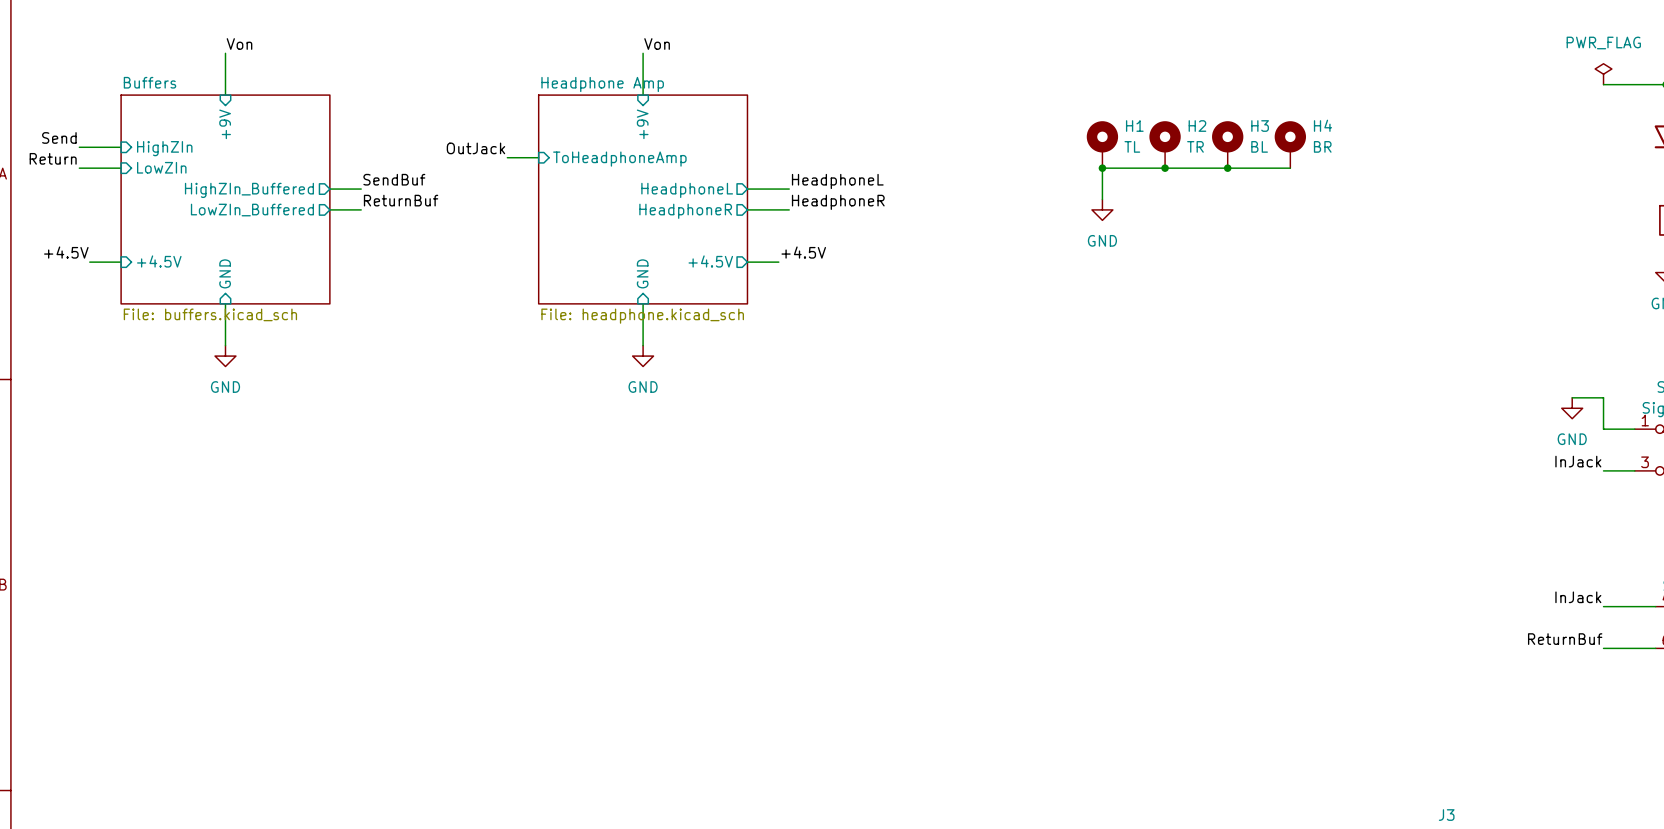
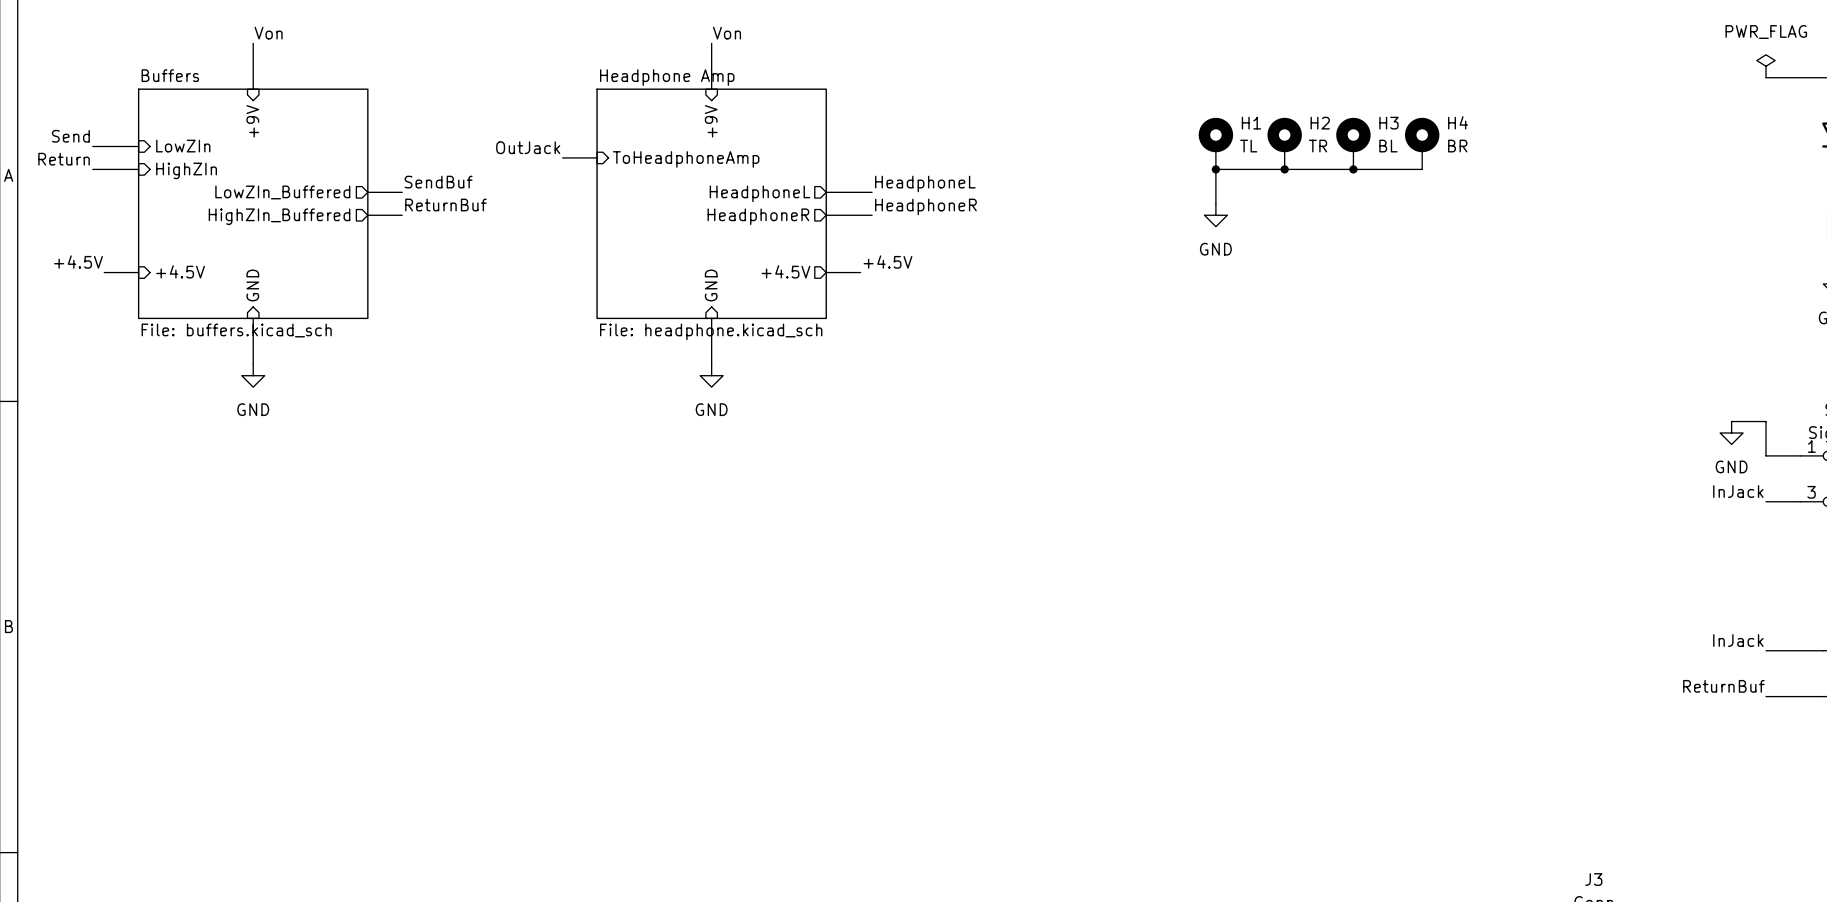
sheet pin: HighZIn (164, 148) -> LowZIn (183, 146)
sheet pin: LowZIn (161, 167) -> HighZIn (186, 170)
sheet pin: HighZIn_Buffered (249, 190) -> LowZIn_Buffered (282, 192)
sheet pin: LowZIn_Buffered (252, 210) -> HighZIn_Buffered (279, 216)

